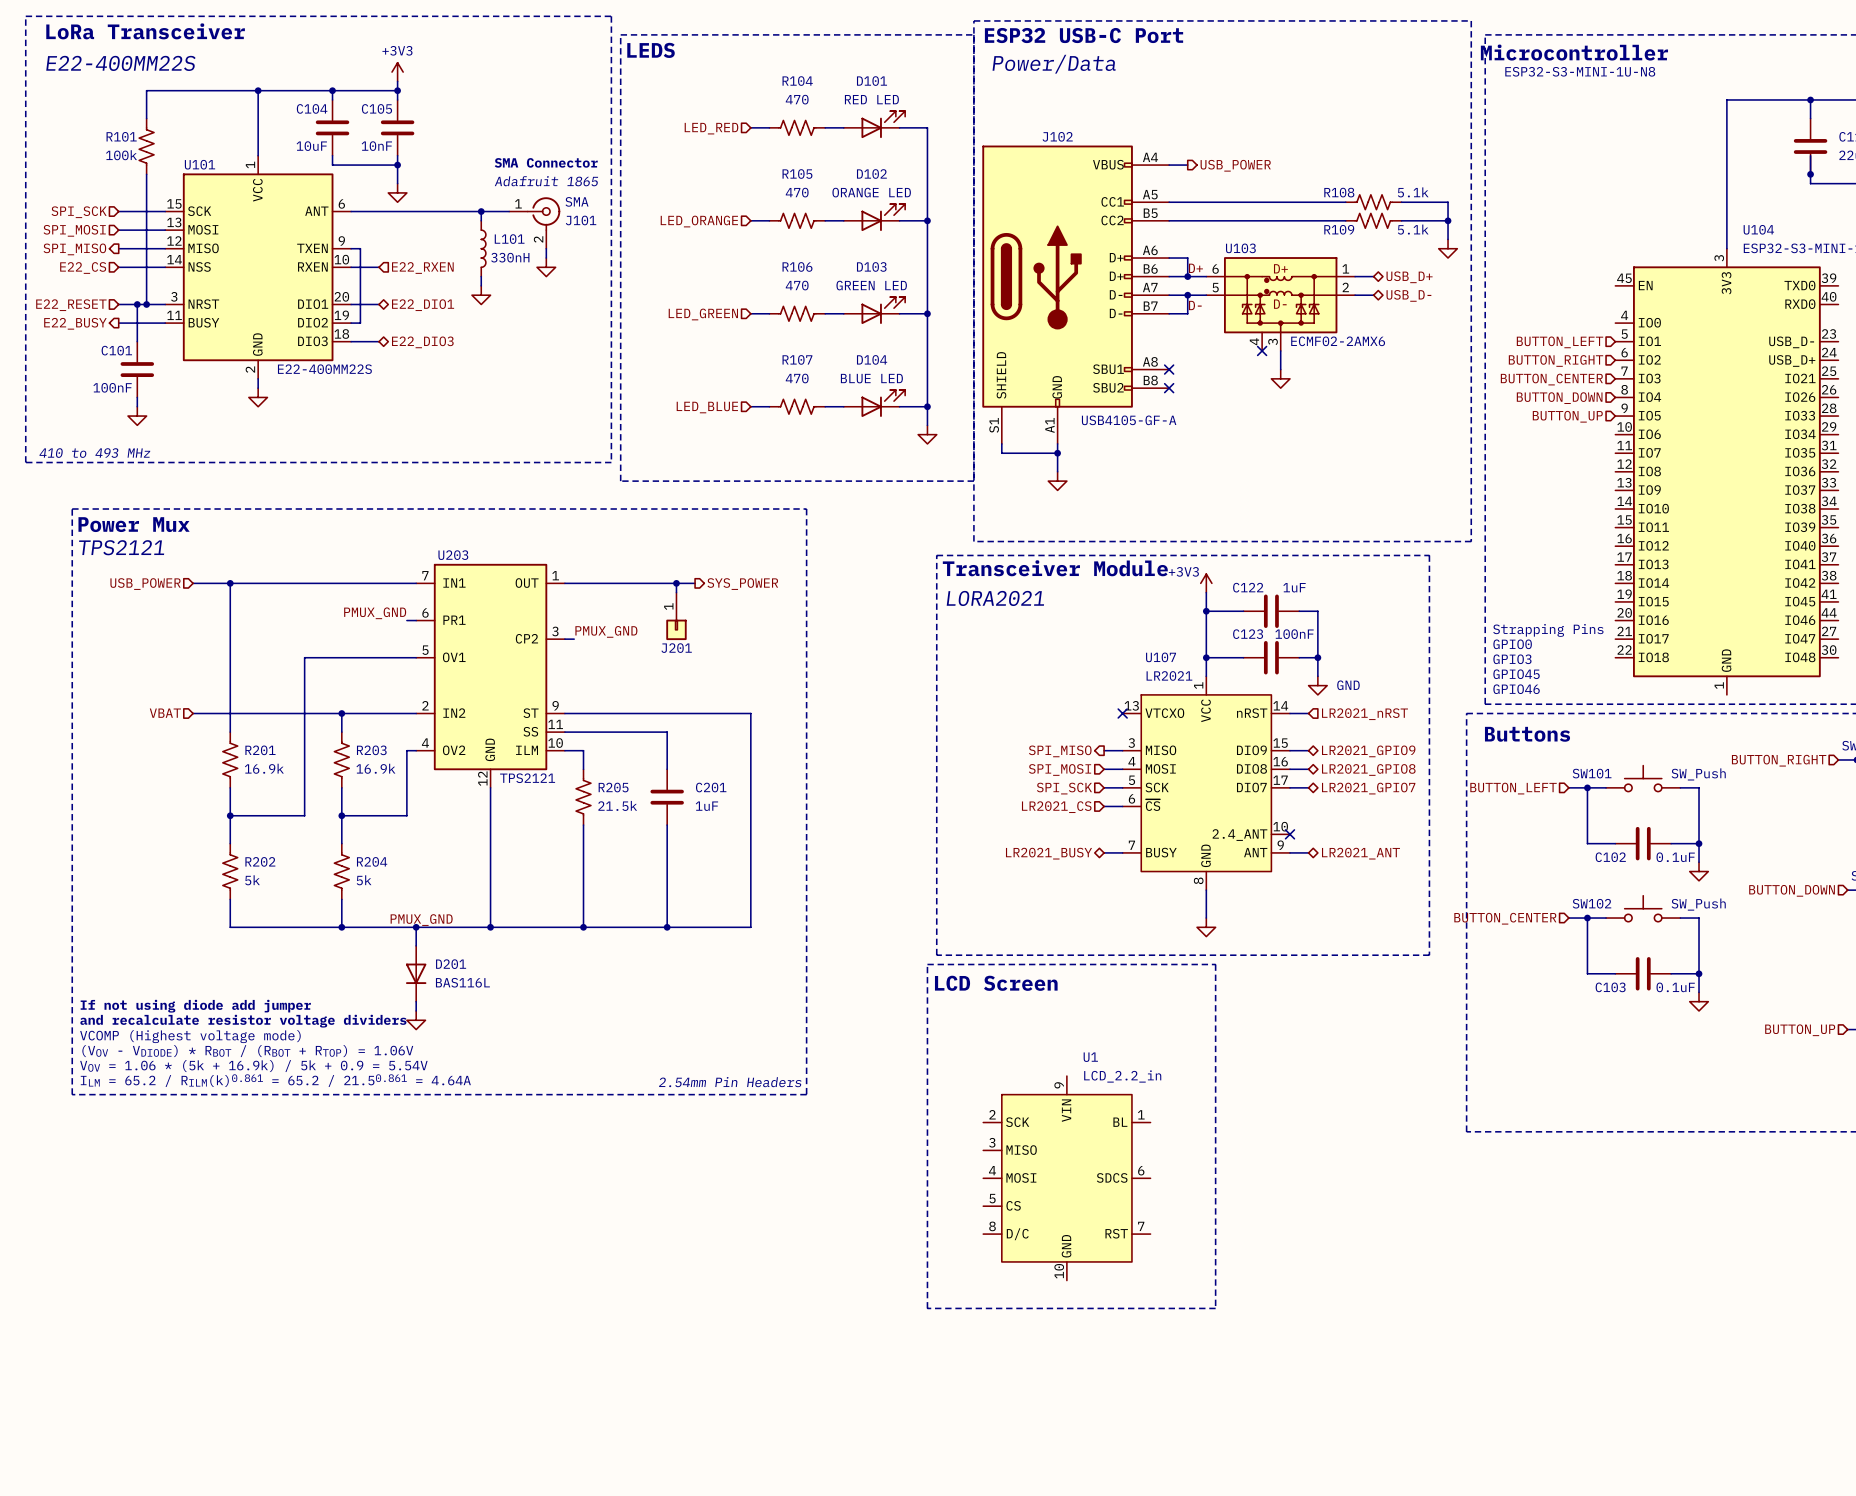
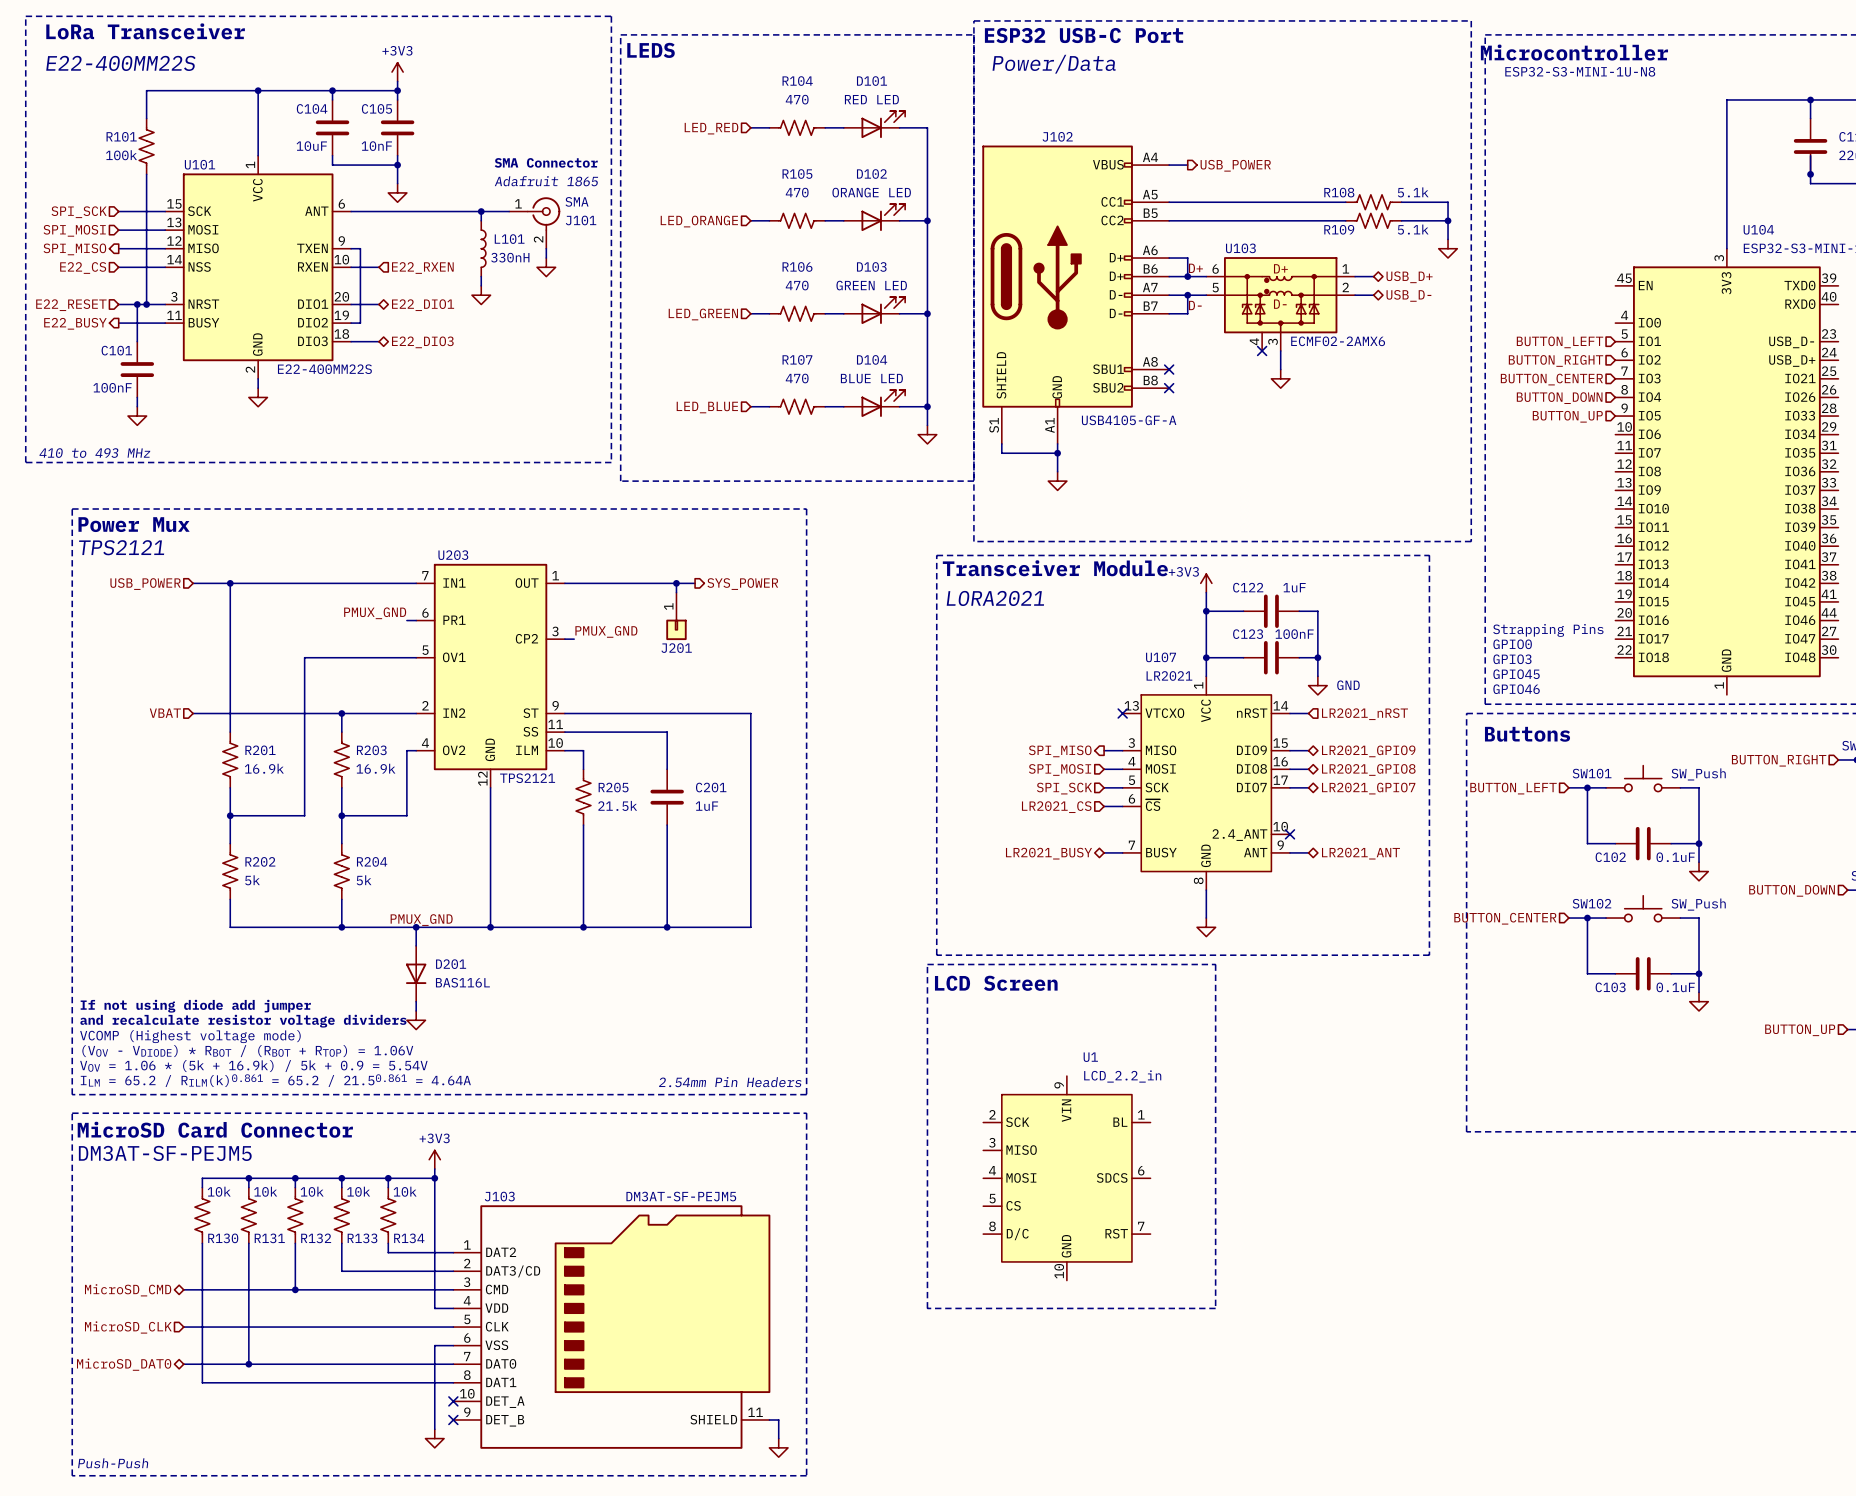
line: none -> (72, 1113) (806, 1113) (806, 1475) (72, 1475) (72, 1113)
text: none -> MicroSD Card Connector (215, 1129)
text: none -> DM3AT-SF-PEJM5 (165, 1153)
power symbol: none -> +3V3 (434, 1159)
wire: none -> (434, 1169) (434, 1308) (453, 1308)
wire: none -> (248, 1178) (248, 1187)
junction: none -> (248, 1178)
wire: none -> (295, 1178) (295, 1187)
junction: none -> (295, 1178)
wire: none -> (341, 1178) (341, 1187)
junction: none -> (341, 1178)
wire: none -> (388, 1178) (388, 1187)
junction: none -> (388, 1178)
wire: none -> (434, 1178) (202, 1178) (202, 1187)
junction: none -> (434, 1178)
R130: none -> 10k (202, 1215)
R131: none -> 10k (248, 1215)
R132: none -> 10k (295, 1215)
R133: none -> 10k (341, 1215)
R134: none -> 10k (388, 1215)
wire: none -> (202, 1243) (202, 1382) (453, 1382)
wire: none -> (248, 1243) (248, 1364)
wire: none -> (295, 1243) (295, 1289)
wire: none -> (341, 1243) (341, 1271) (453, 1271)
wire: none -> (388, 1243) (388, 1252) (453, 1252)
wire: none -> (183, 1289) (453, 1289)
junction: none -> (295, 1289)
hierarchical label: none -> MicroSD_CMD (128, 1290)
hierarchical label: none -> MicroSD_CLK (128, 1327)
wire: none -> (183, 1327) (453, 1327)
J103: none -> DM3AT-SF-PEJM5 (611, 1327)
wire: none -> (453, 1345) (434, 1345) (434, 1429)
hierarchical label: none -> MicroSD_DAT0 (124, 1364)
wire: none -> (183, 1364) (453, 1364)
junction: none -> (248, 1364)
no-connect mark: none -> (453, 1401)
no-connect mark: none -> (453, 1419)
wire: none -> (769, 1419) (778, 1419) (778, 1438)
power symbol: none -> (434, 1438)
power symbol: none -> (778, 1447)
text: none -> Push-Push (113, 1463)

